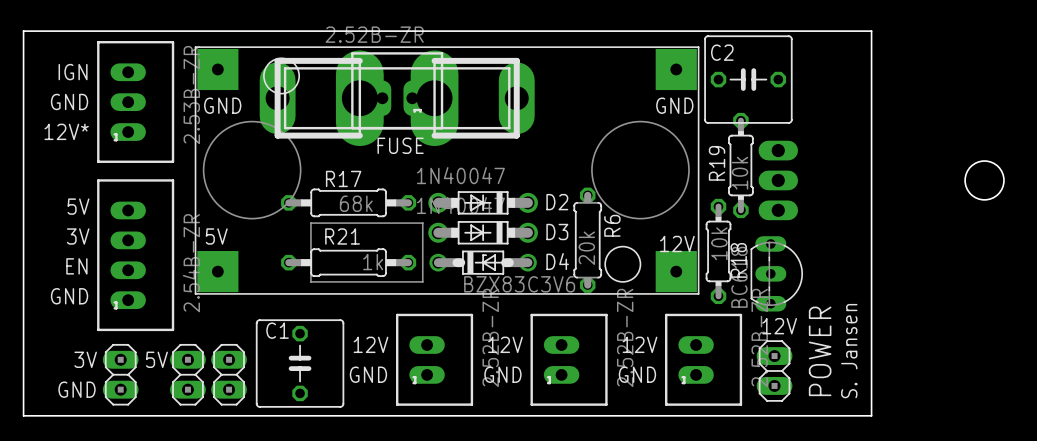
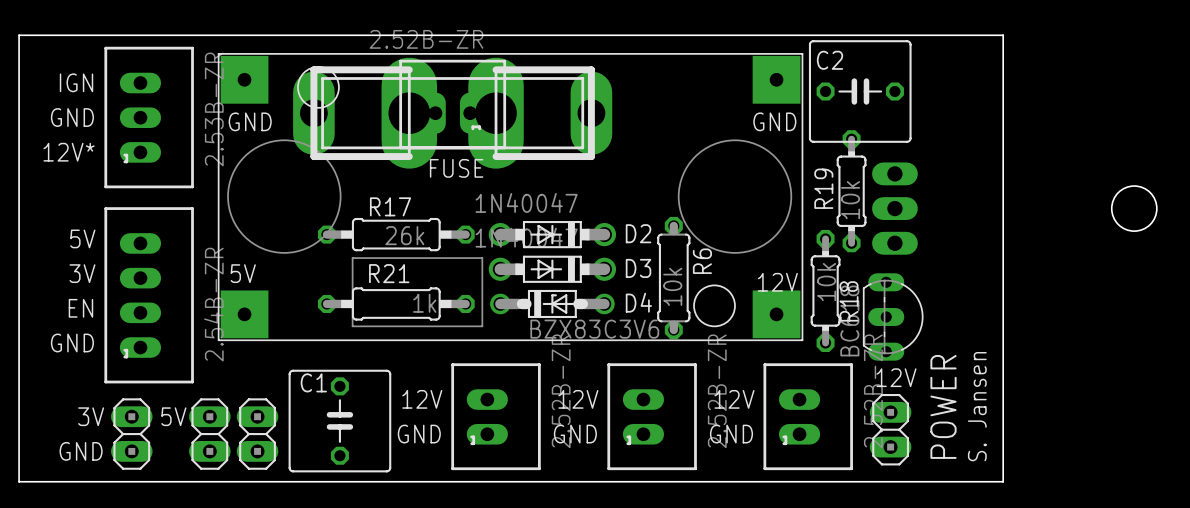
R17 value: 68k (356, 203) -> 26k (404, 235)
R6 value: 20k (586, 248) -> 10k (672, 286)

